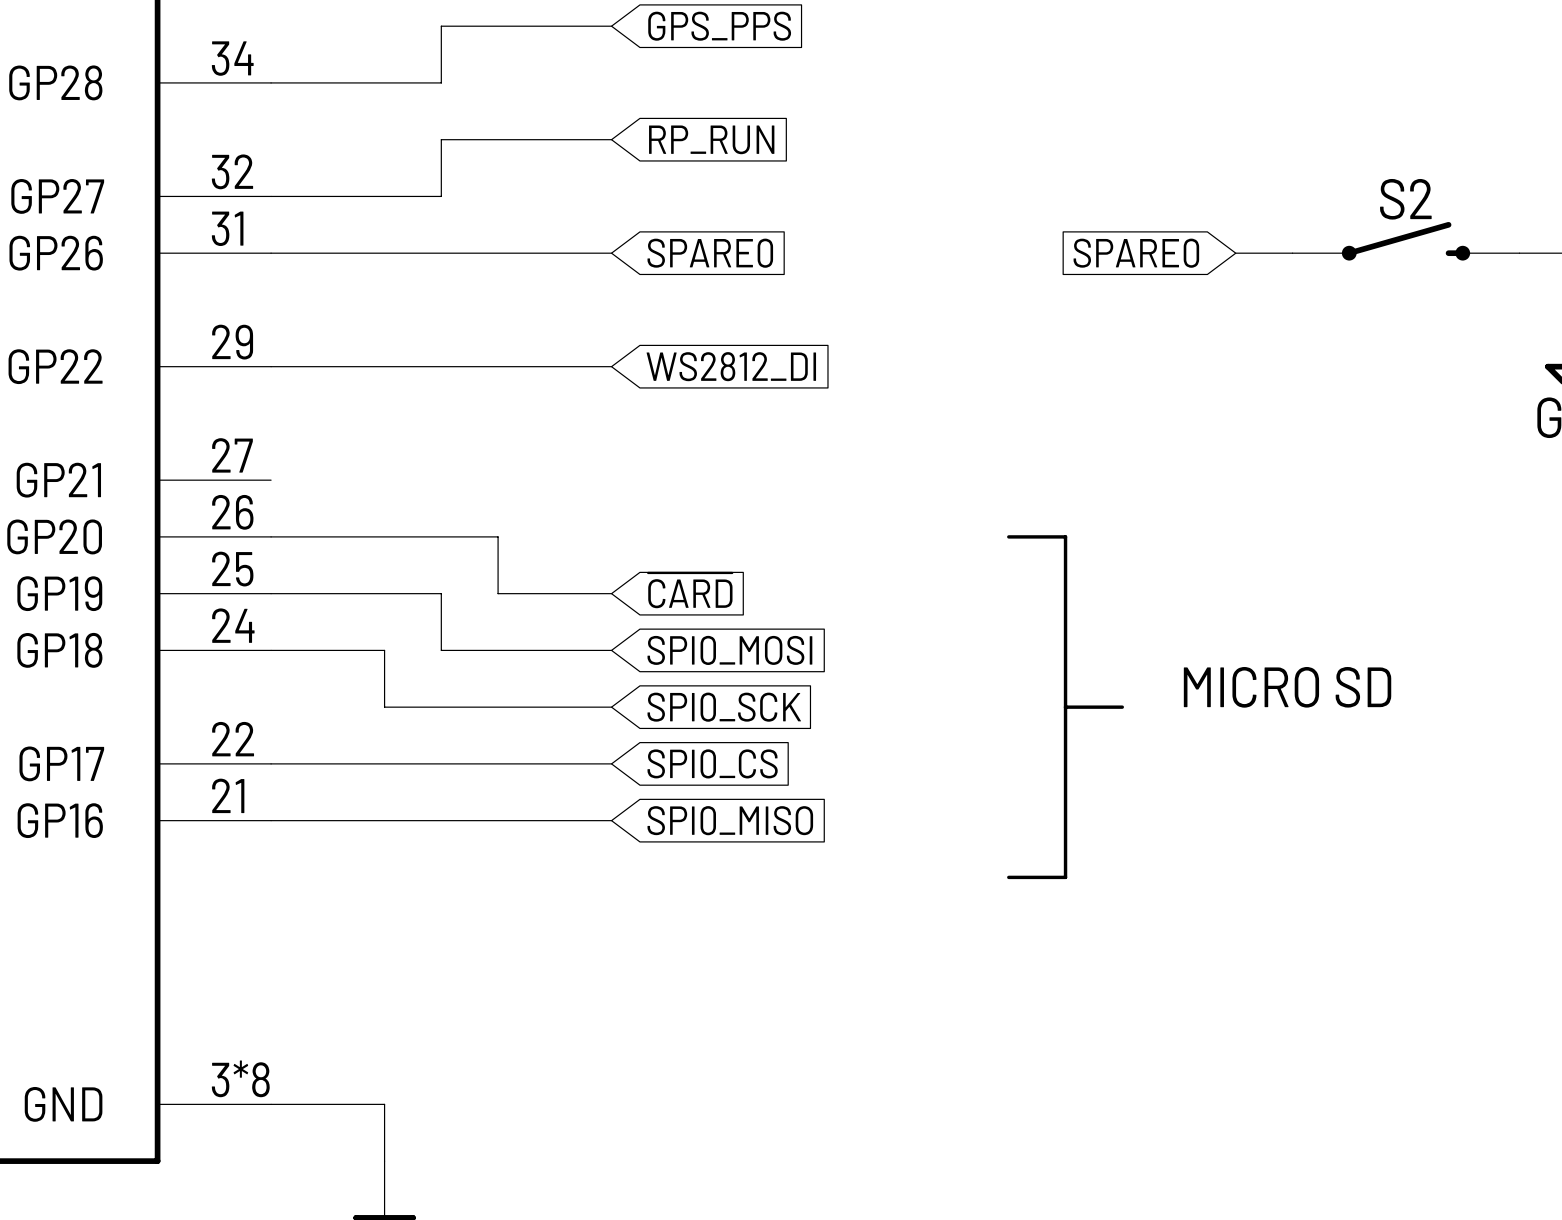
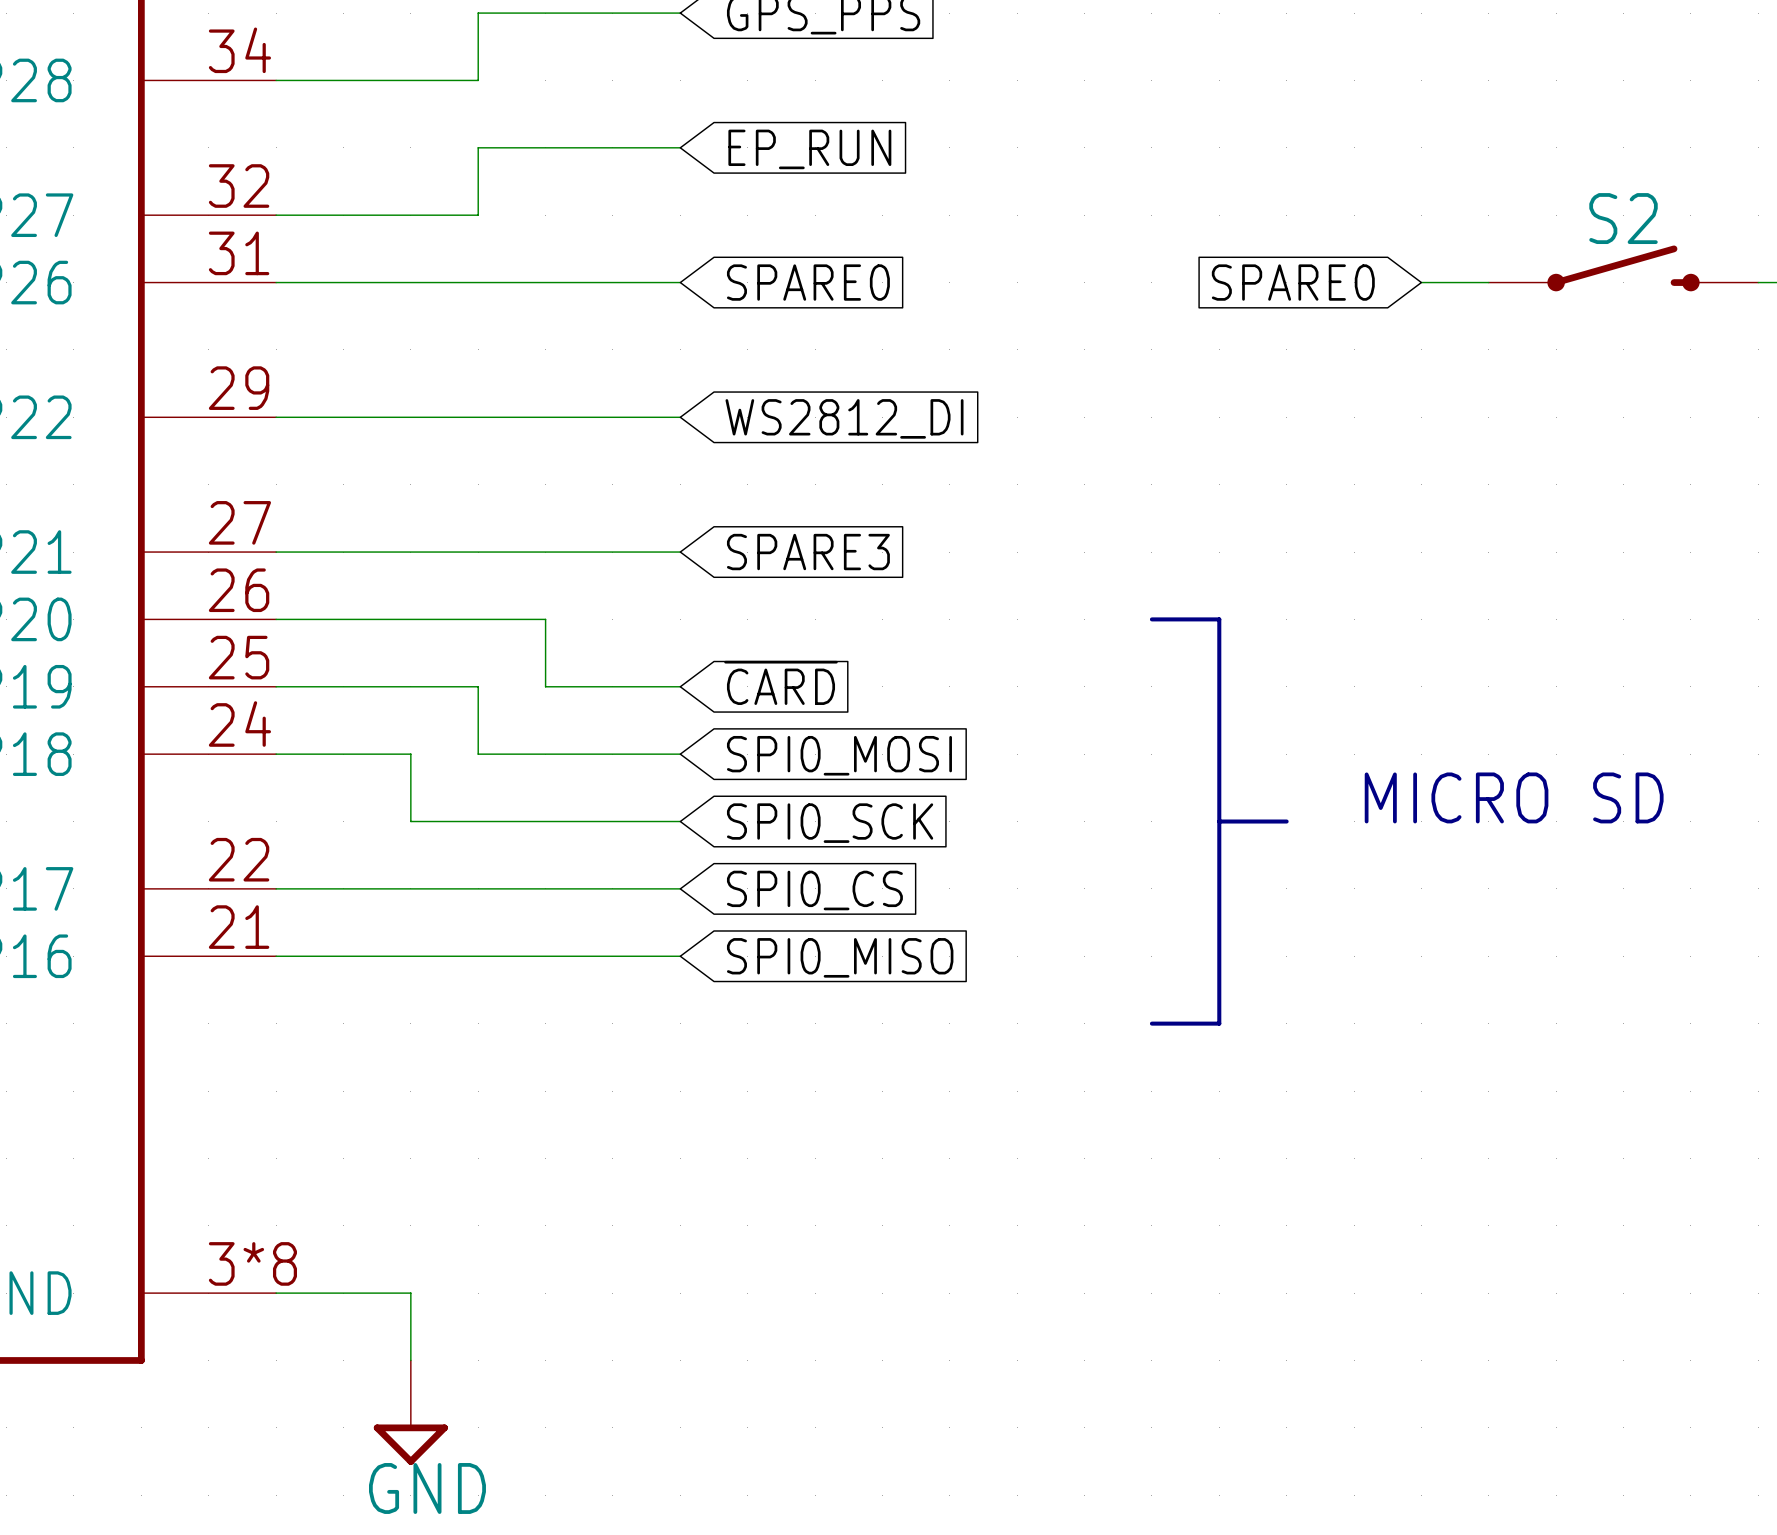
global label: RP_RUN (711, 139) -> EP_RUN (809, 149)
wire: none -> (276, 552) (680, 552)
global label: none -> SPARE3 (808, 552)

